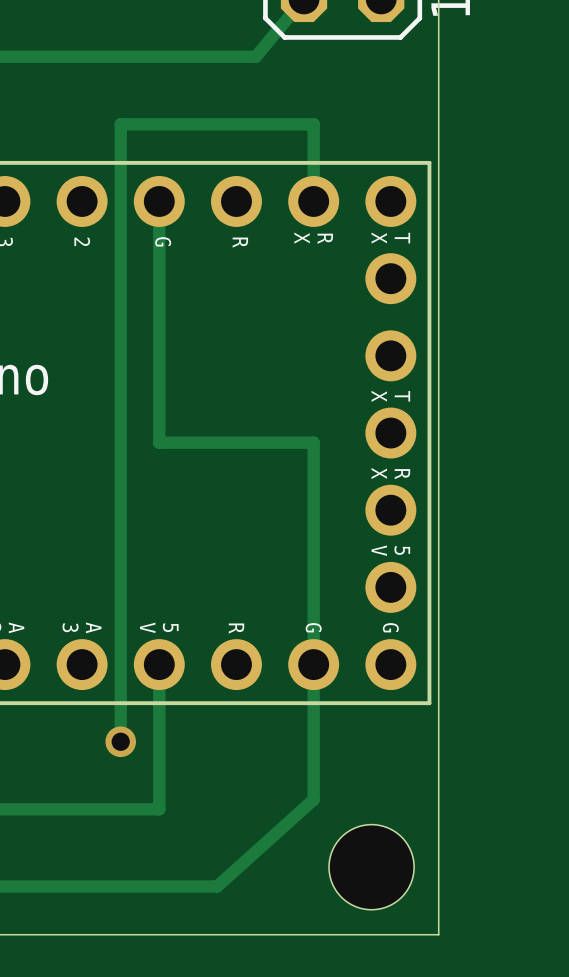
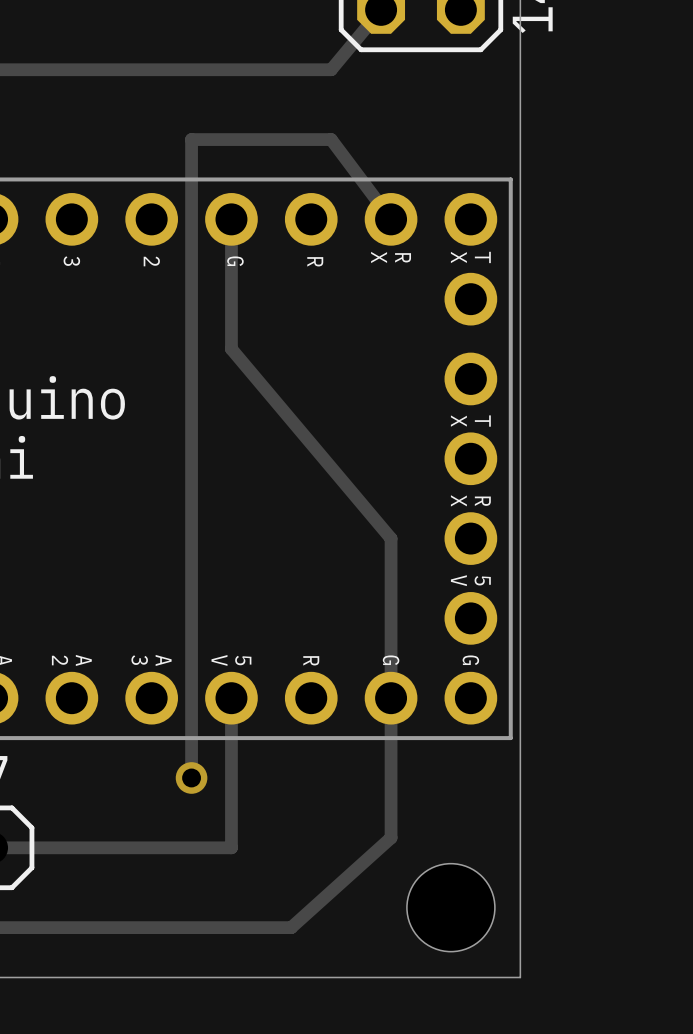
track: (255, 124) (313, 124) (313, 201) -> (331, 139) (391, 219)
track: (159, 326) (159, 442) (313, 442) (313, 510) -> (231, 349) (391, 538)

